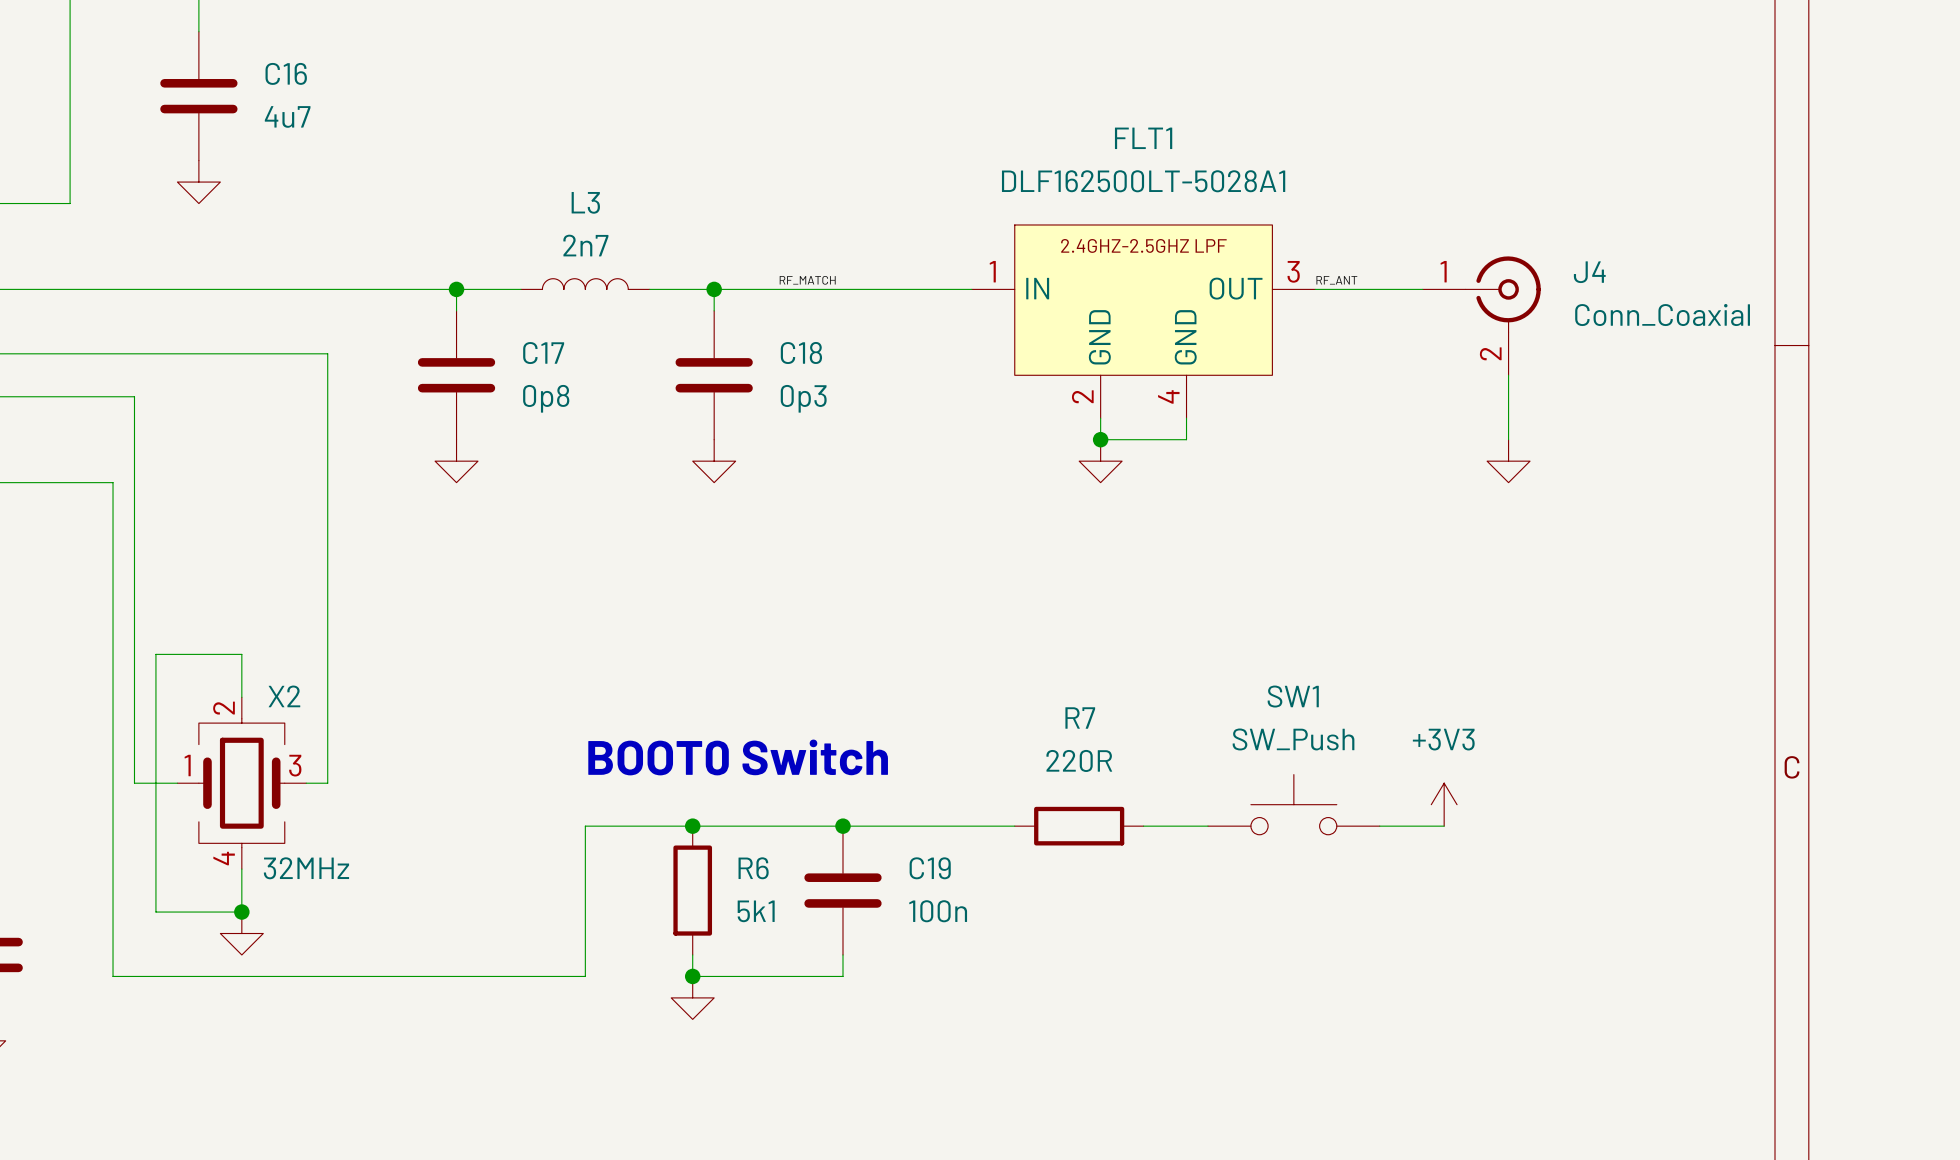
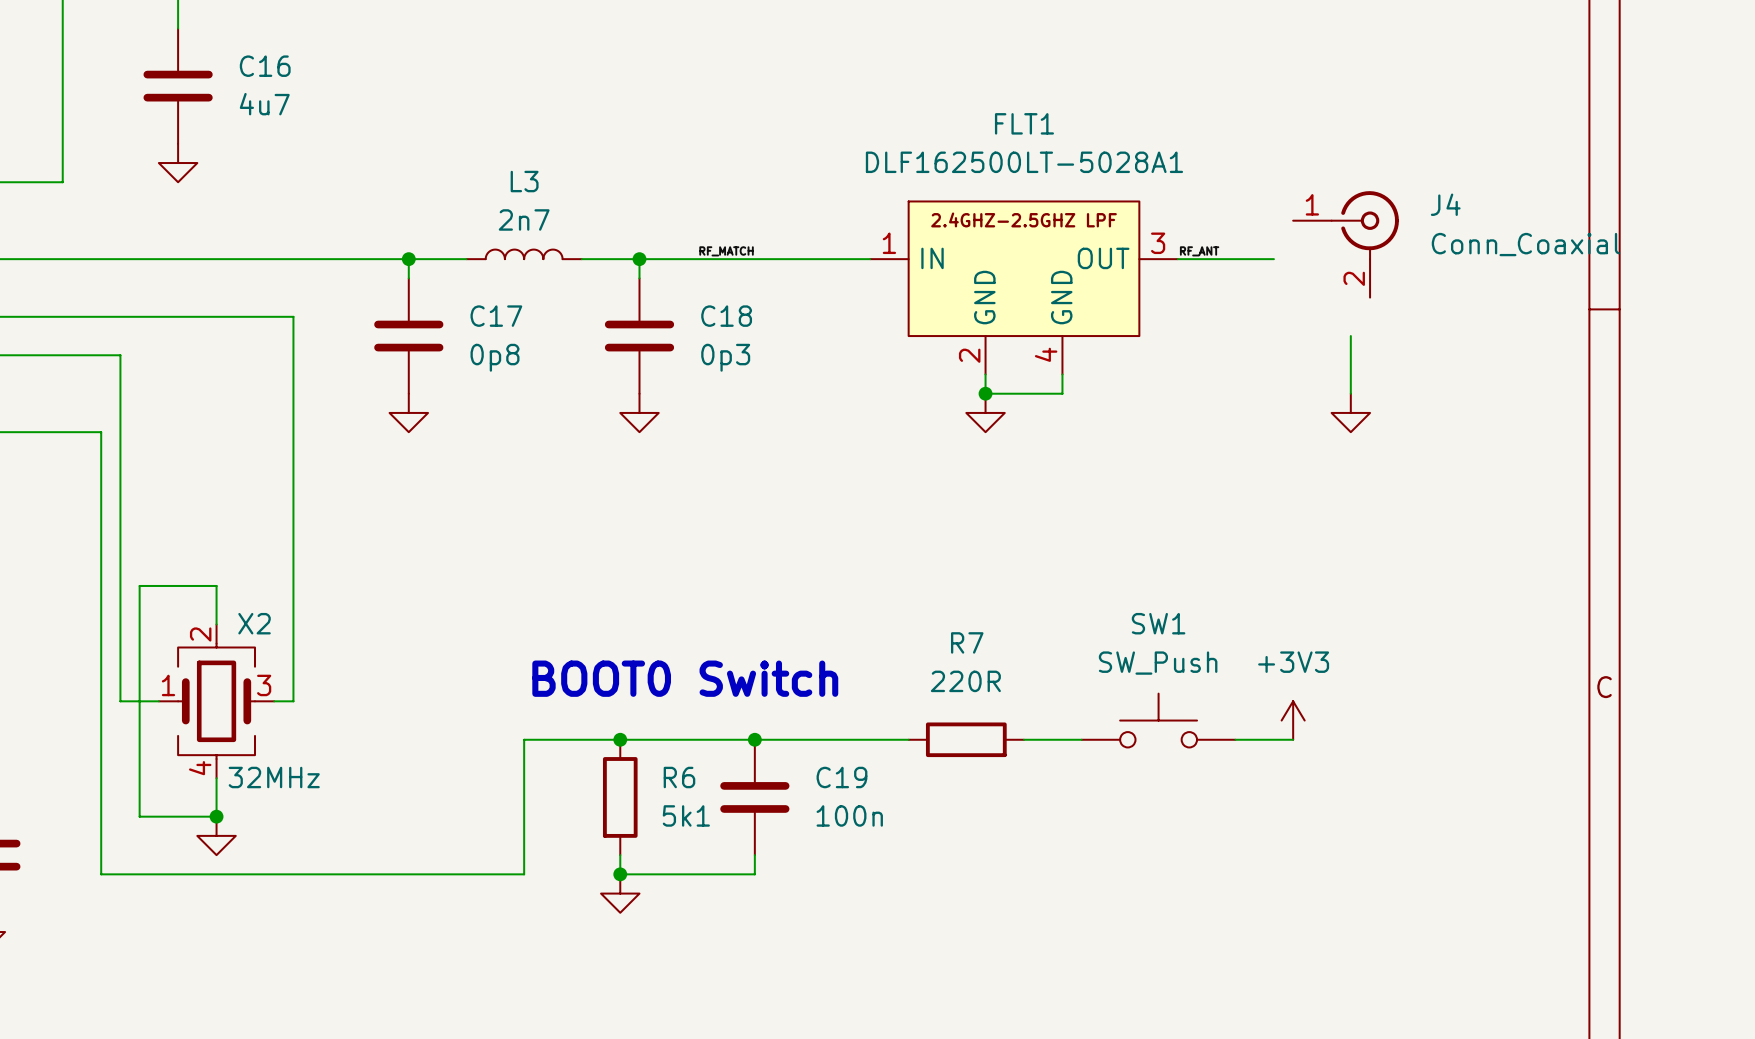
J4 position: (1481, 315) -> (1346, 244)

